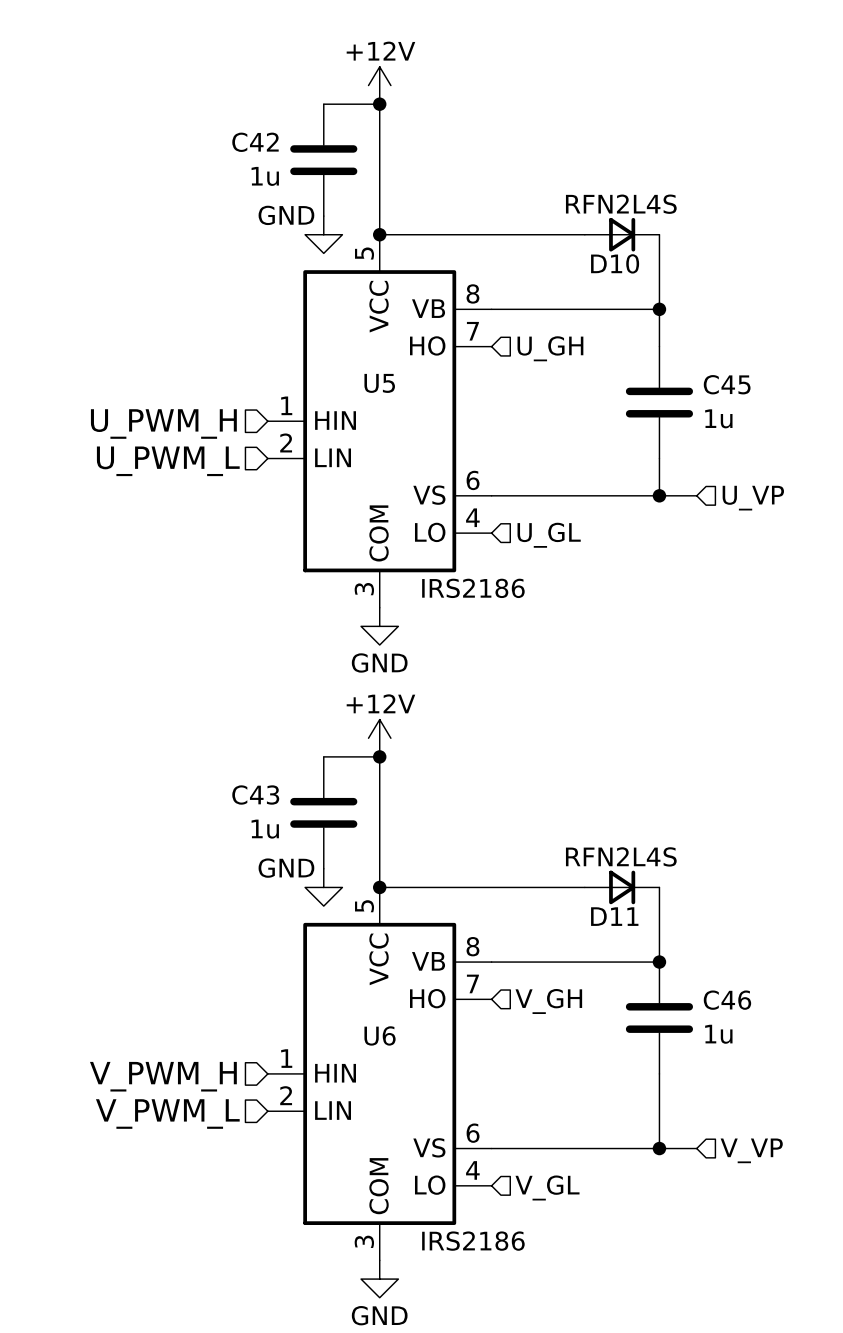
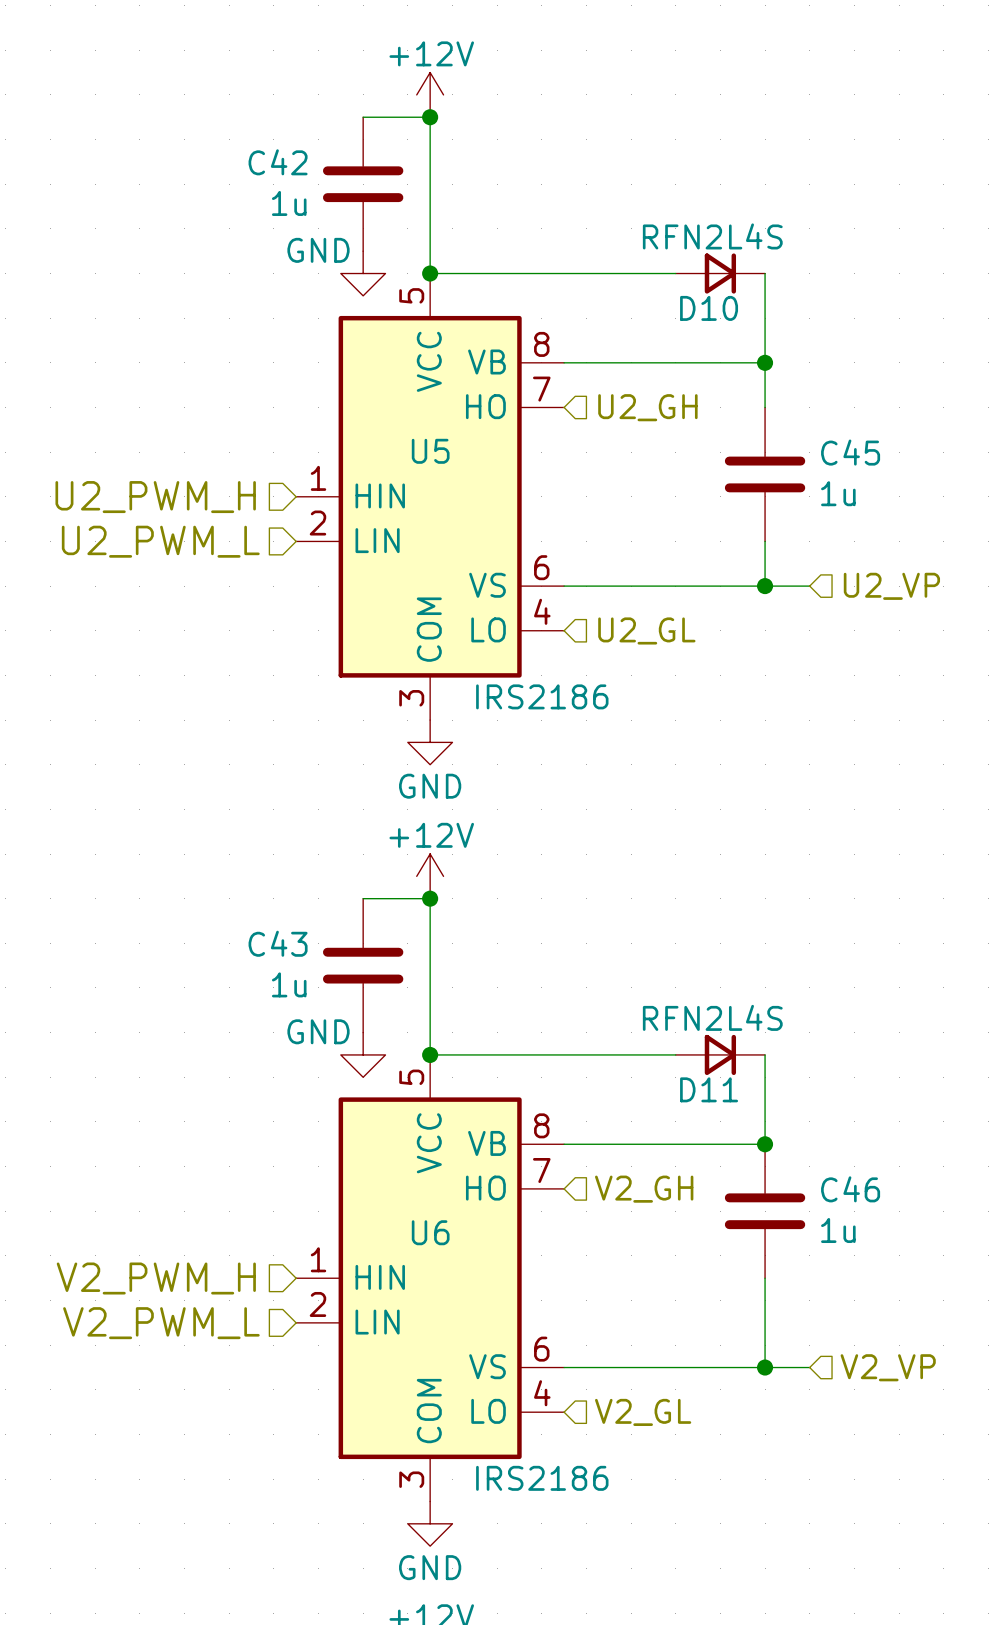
hierarchical label: U_GH (550, 348) -> U2_GH (647, 407)
hierarchical label: U_PWM_H (163, 424) -> U2_PWM_H (155, 497)
hierarchical label: U_PWM_L (168, 461) -> U2_PWM_L (160, 541)
hierarchical label: U_VP (753, 498) -> U2_VP (891, 586)
hierarchical label: U_GL (549, 535) -> U2_GL (646, 630)
hierarchical label: V_GH (548, 1001) -> V2_GH (644, 1189)
hierarchical label: V_PWM_H (163, 1076) -> V2_PWM_H (156, 1278)
hierarchical label: V_PWM_L (167, 1114) -> V2_PWM_L (161, 1323)
hierarchical label: V_VP (751, 1150) -> V2_VP (888, 1367)
hierarchical label: V_GL (547, 1187) -> V2_GL (643, 1412)

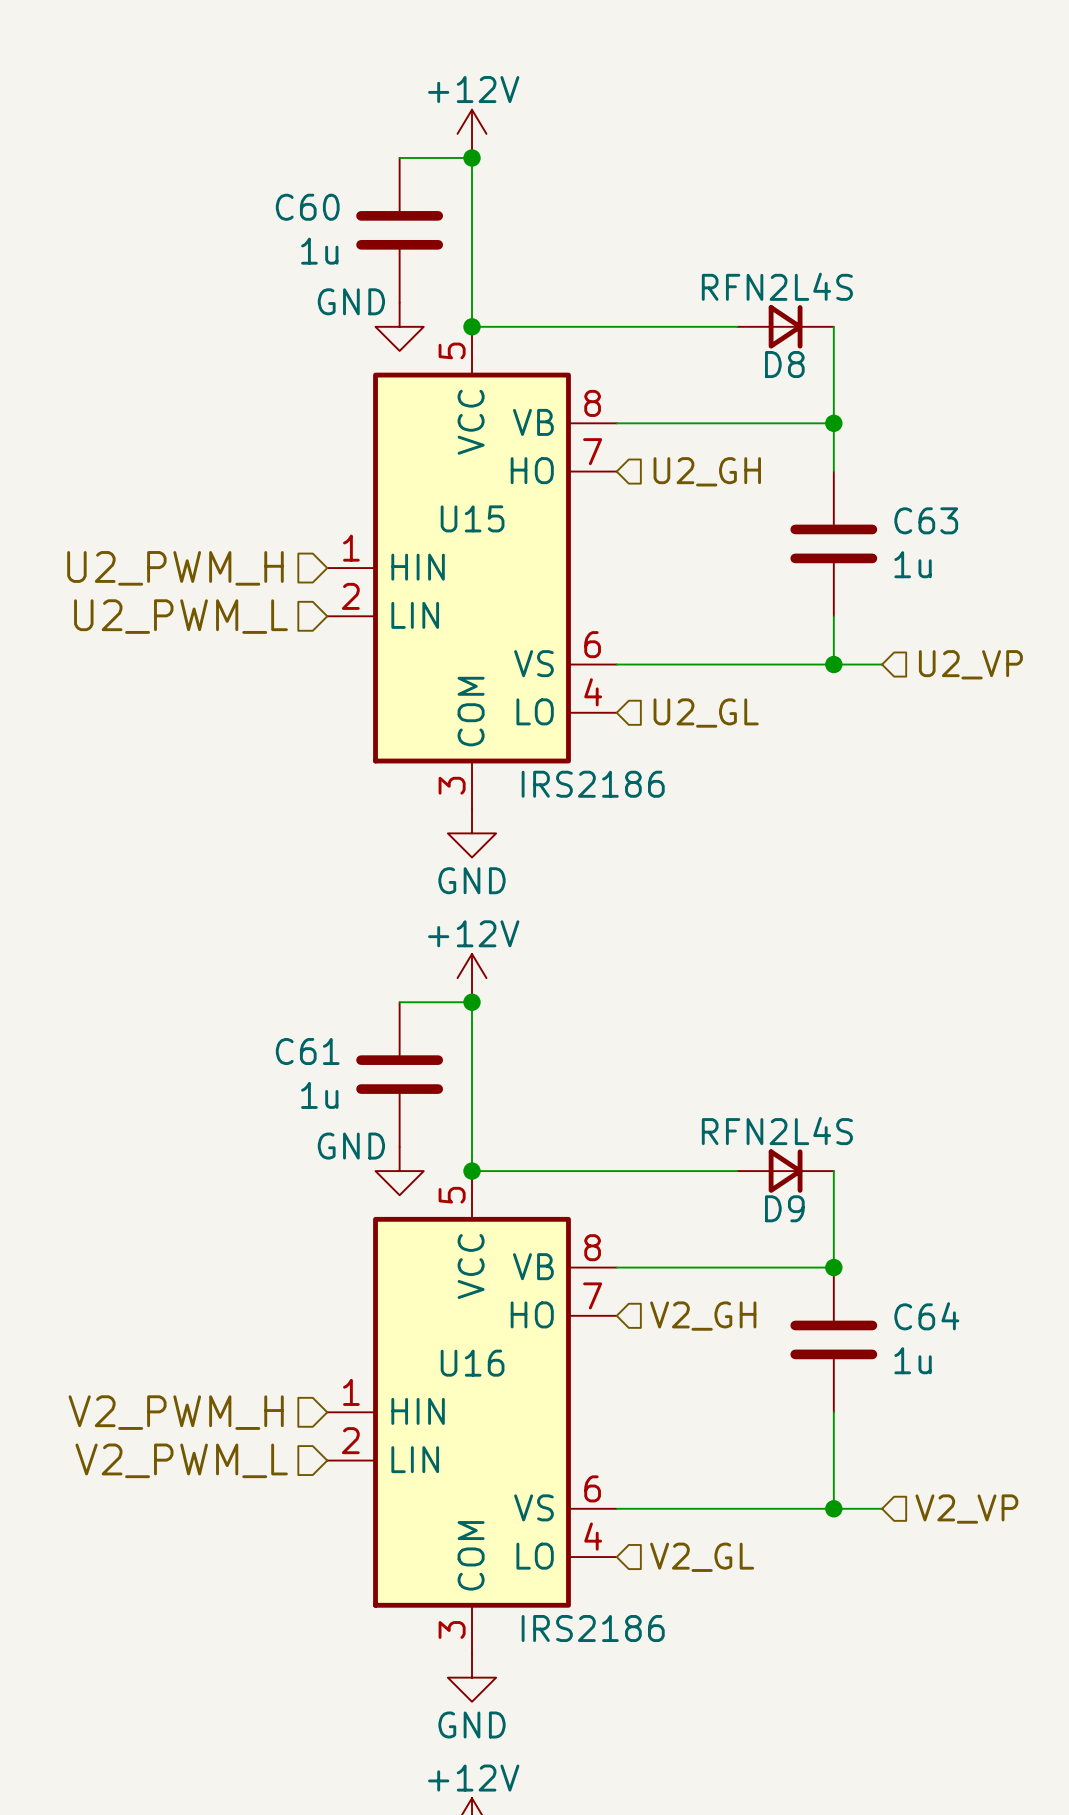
C42 name: C42 (278, 162) -> C60 (307, 207)
D10 name: D10 (709, 308) -> D8 (784, 364)
U5 name: U5 (430, 451) -> U15 (472, 518)
C45 name: C45 (850, 452) -> C63 (926, 520)
C43 name: C43 (278, 943) -> C61 (307, 1051)
D11 name: D11 (709, 1089) -> D9 (784, 1208)
C46 name: C46 (850, 1189) -> C64 (926, 1316)
U6 name: U6 (430, 1232) -> U16 (472, 1363)

